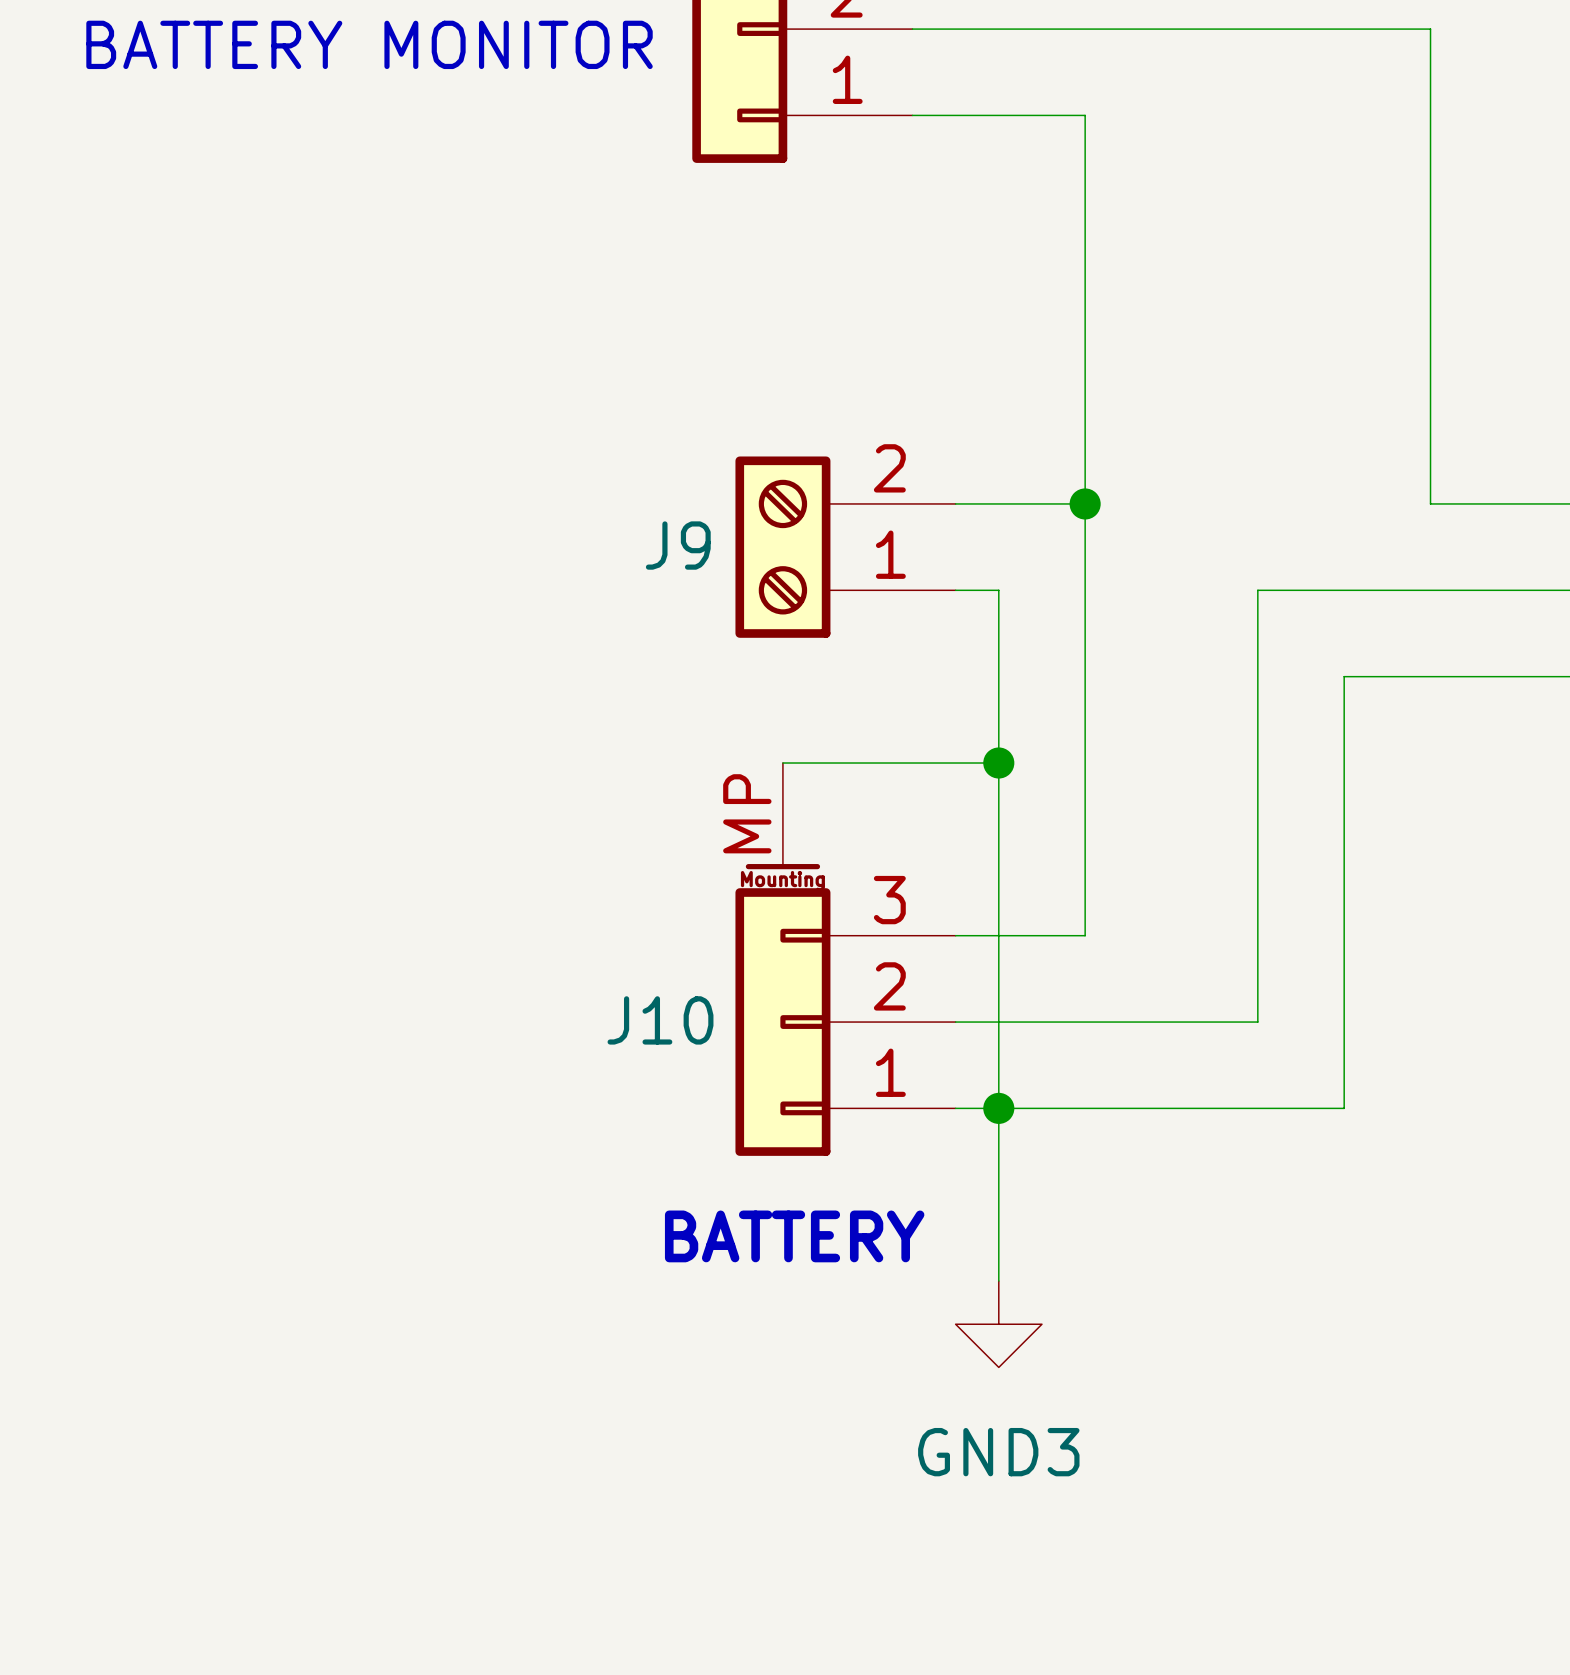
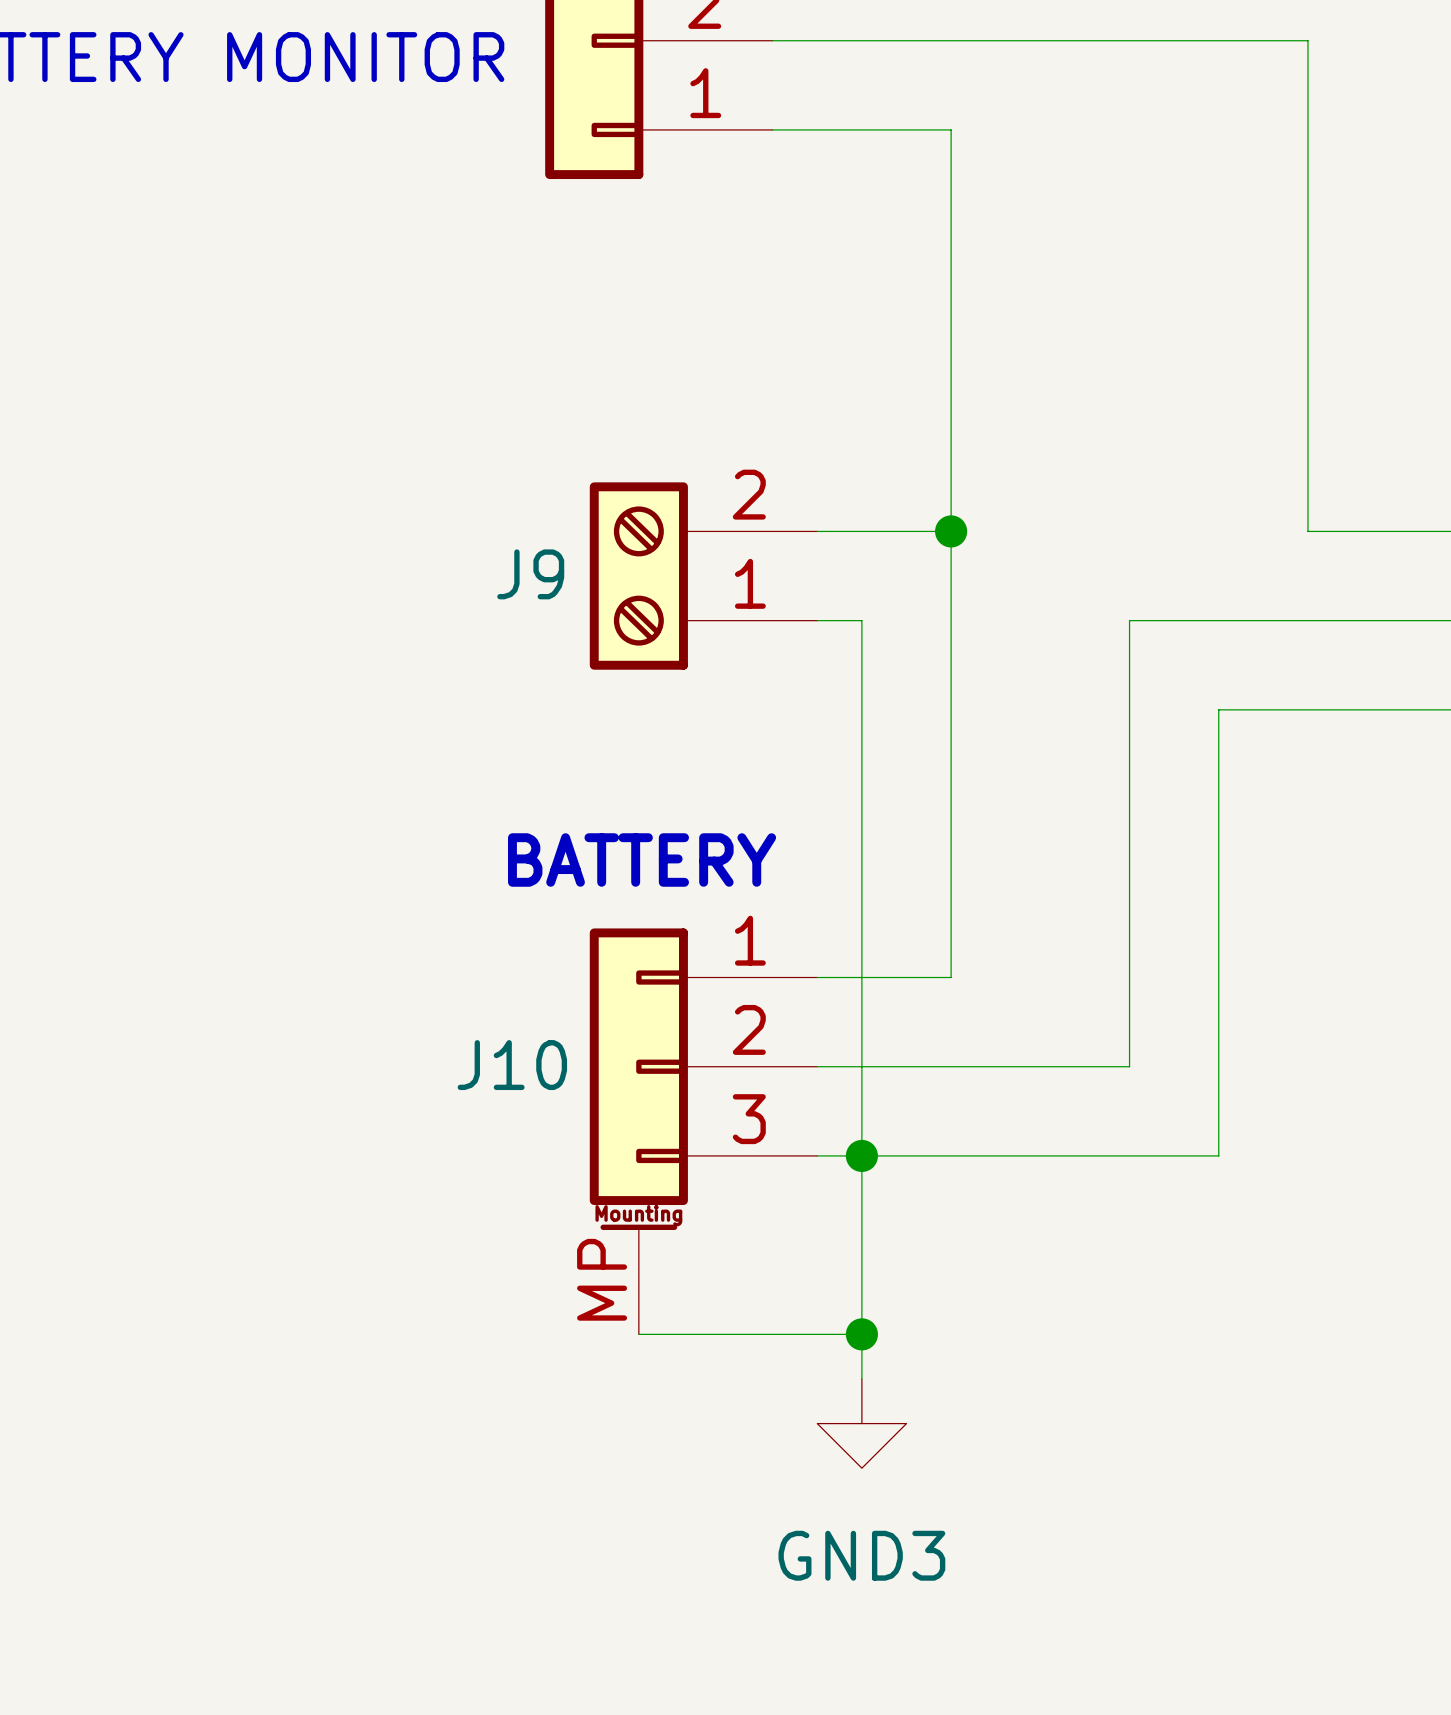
wire: (782, 763) (998, 763) -> none
junction: (998, 763) -> none
J10 flip: as is (782, 1009) -> up-down (638, 1079)
text position: BATTERY (794, 1236) -> BATTERY (642, 860)
wire: none -> (638, 1334) (861, 1334) (861, 1378)
junction: none -> (861, 1334)
power symbol position: GND3 (998, 1324) -> GND3 (861, 1423)

